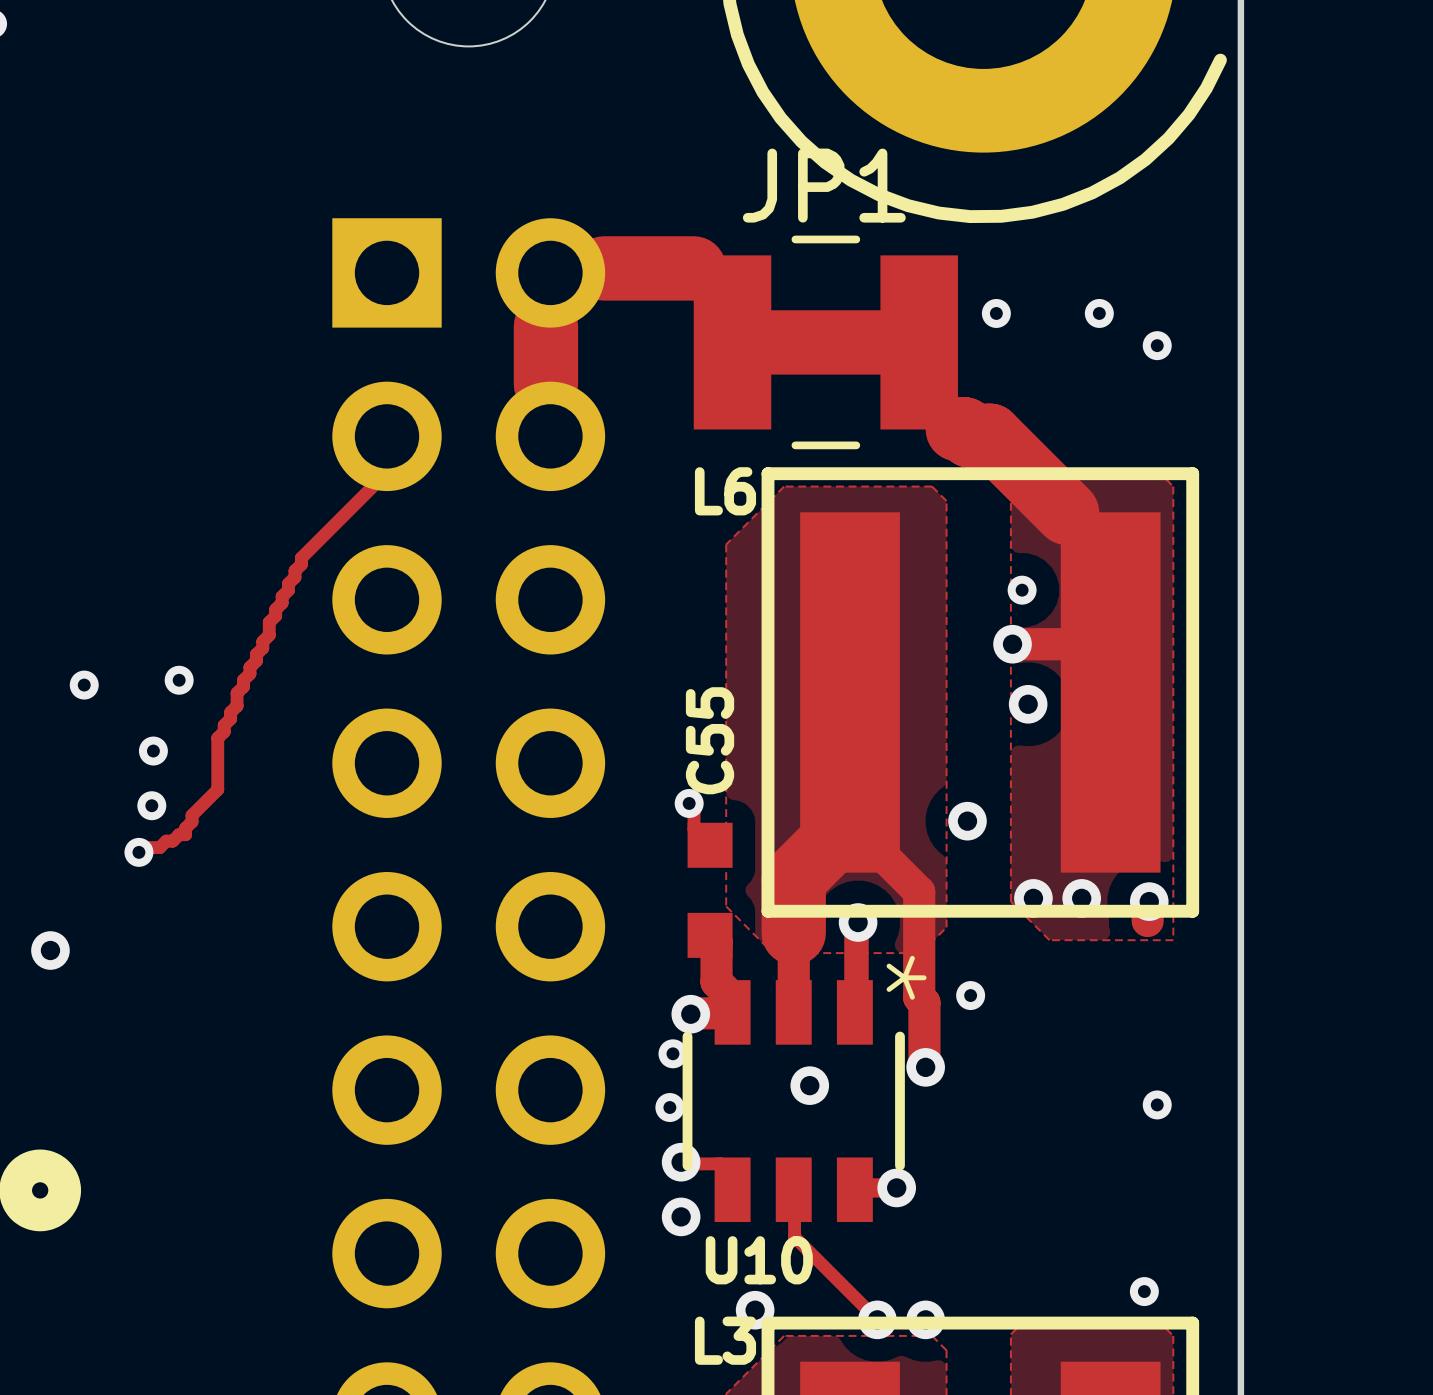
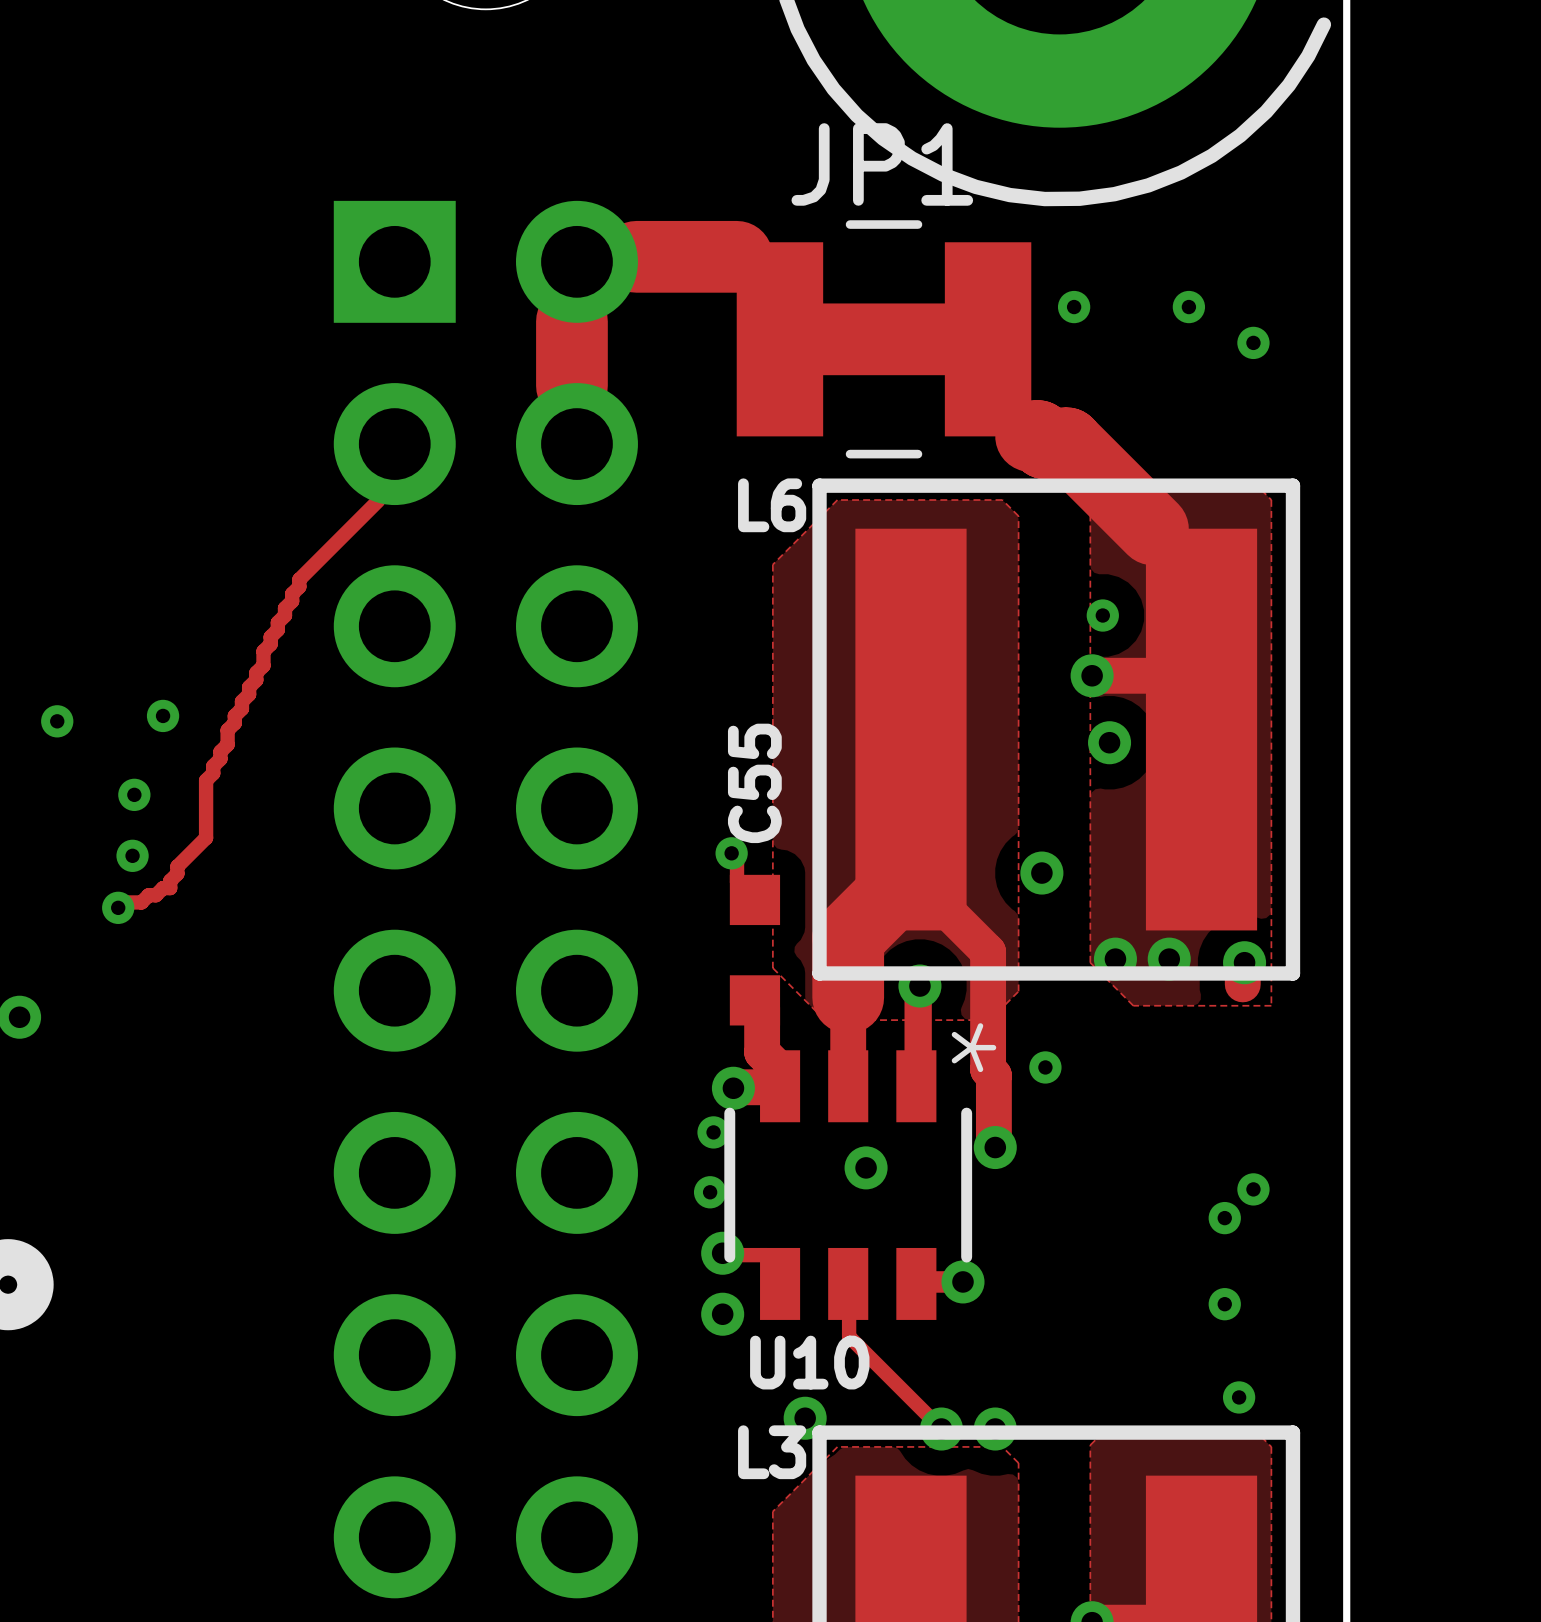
via: none -> (1224, 1218)
via: none -> (1224, 1304)

